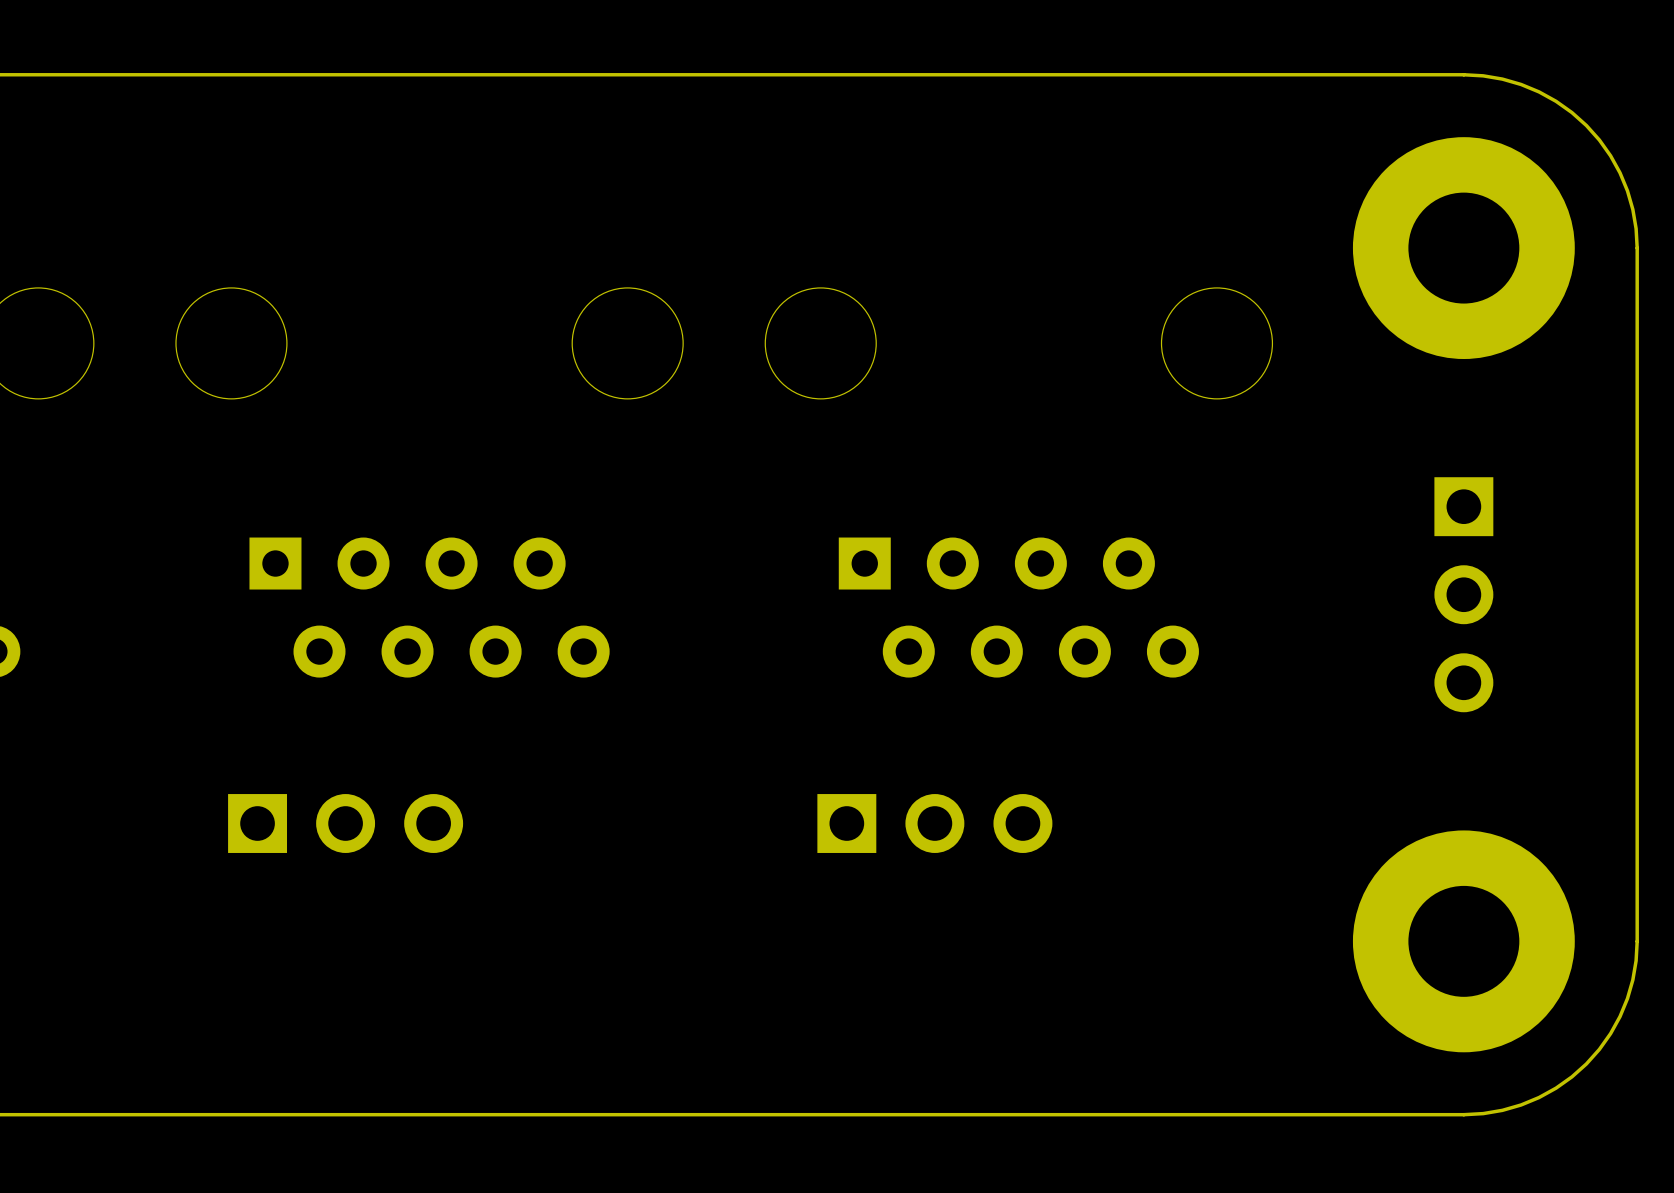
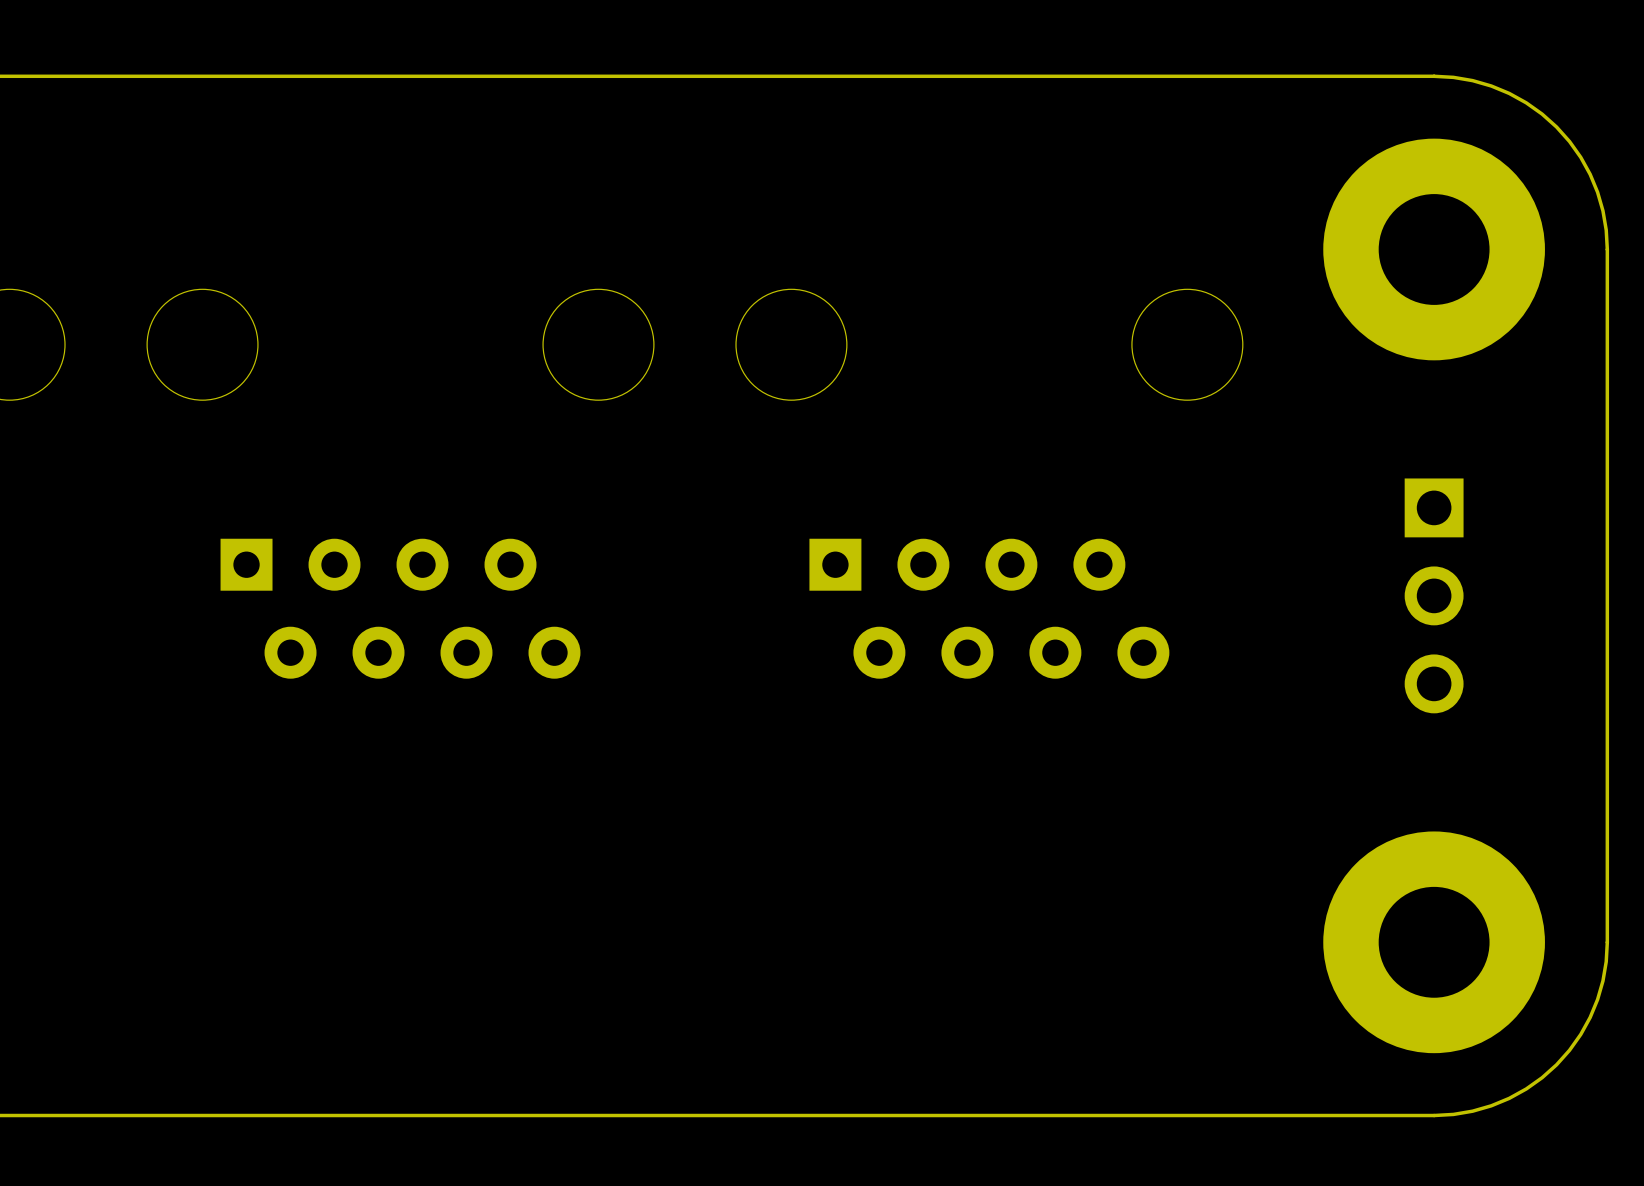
part: (345, 823) -> none
part: (934, 823) -> none

